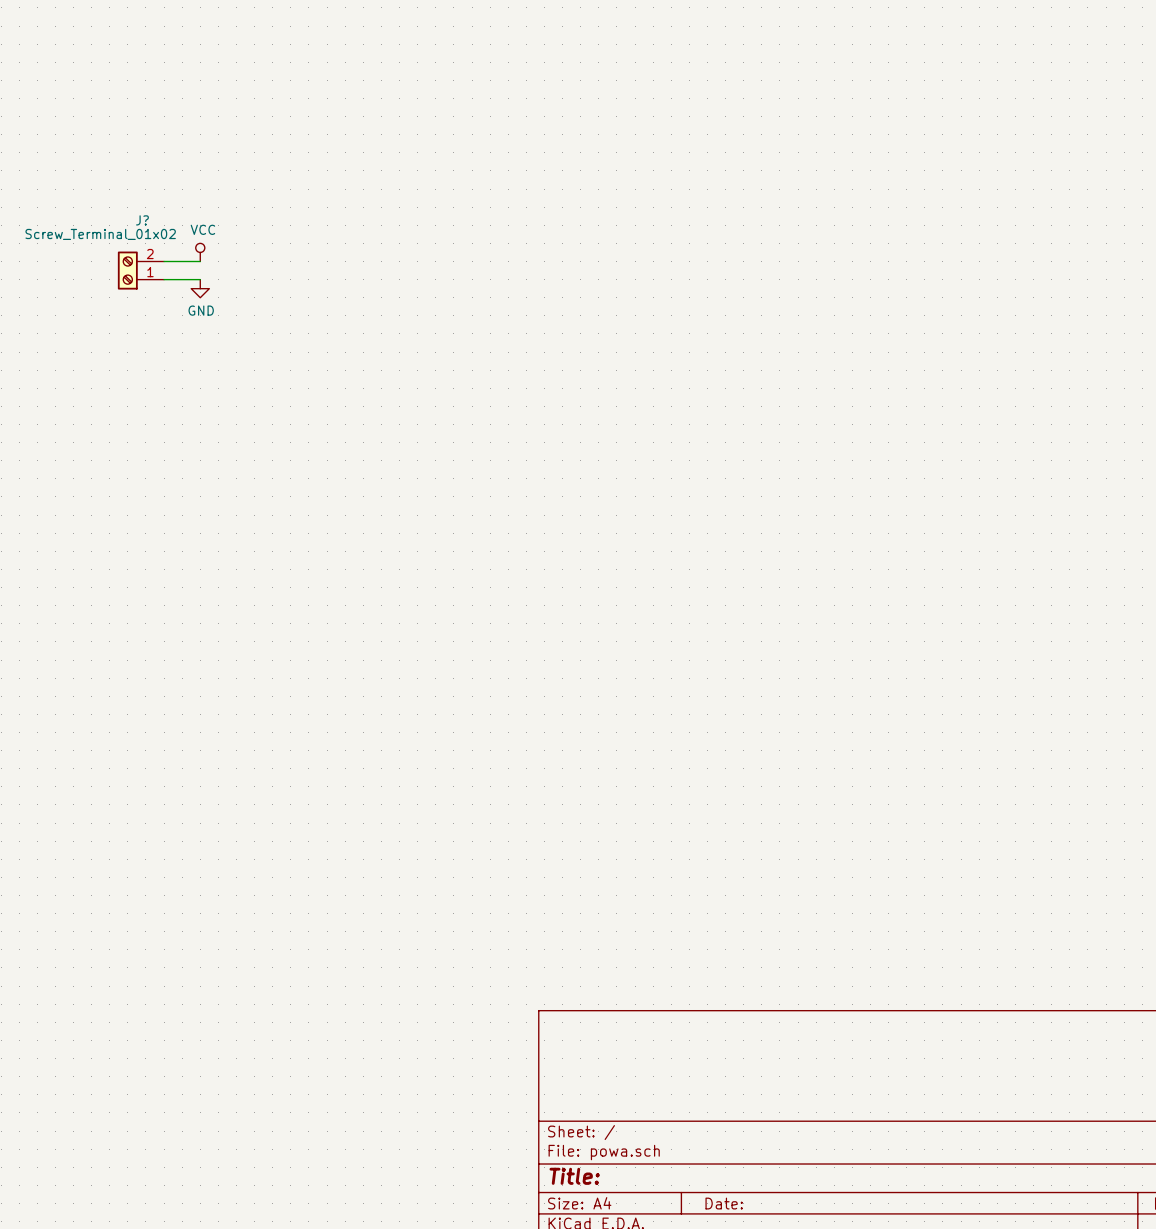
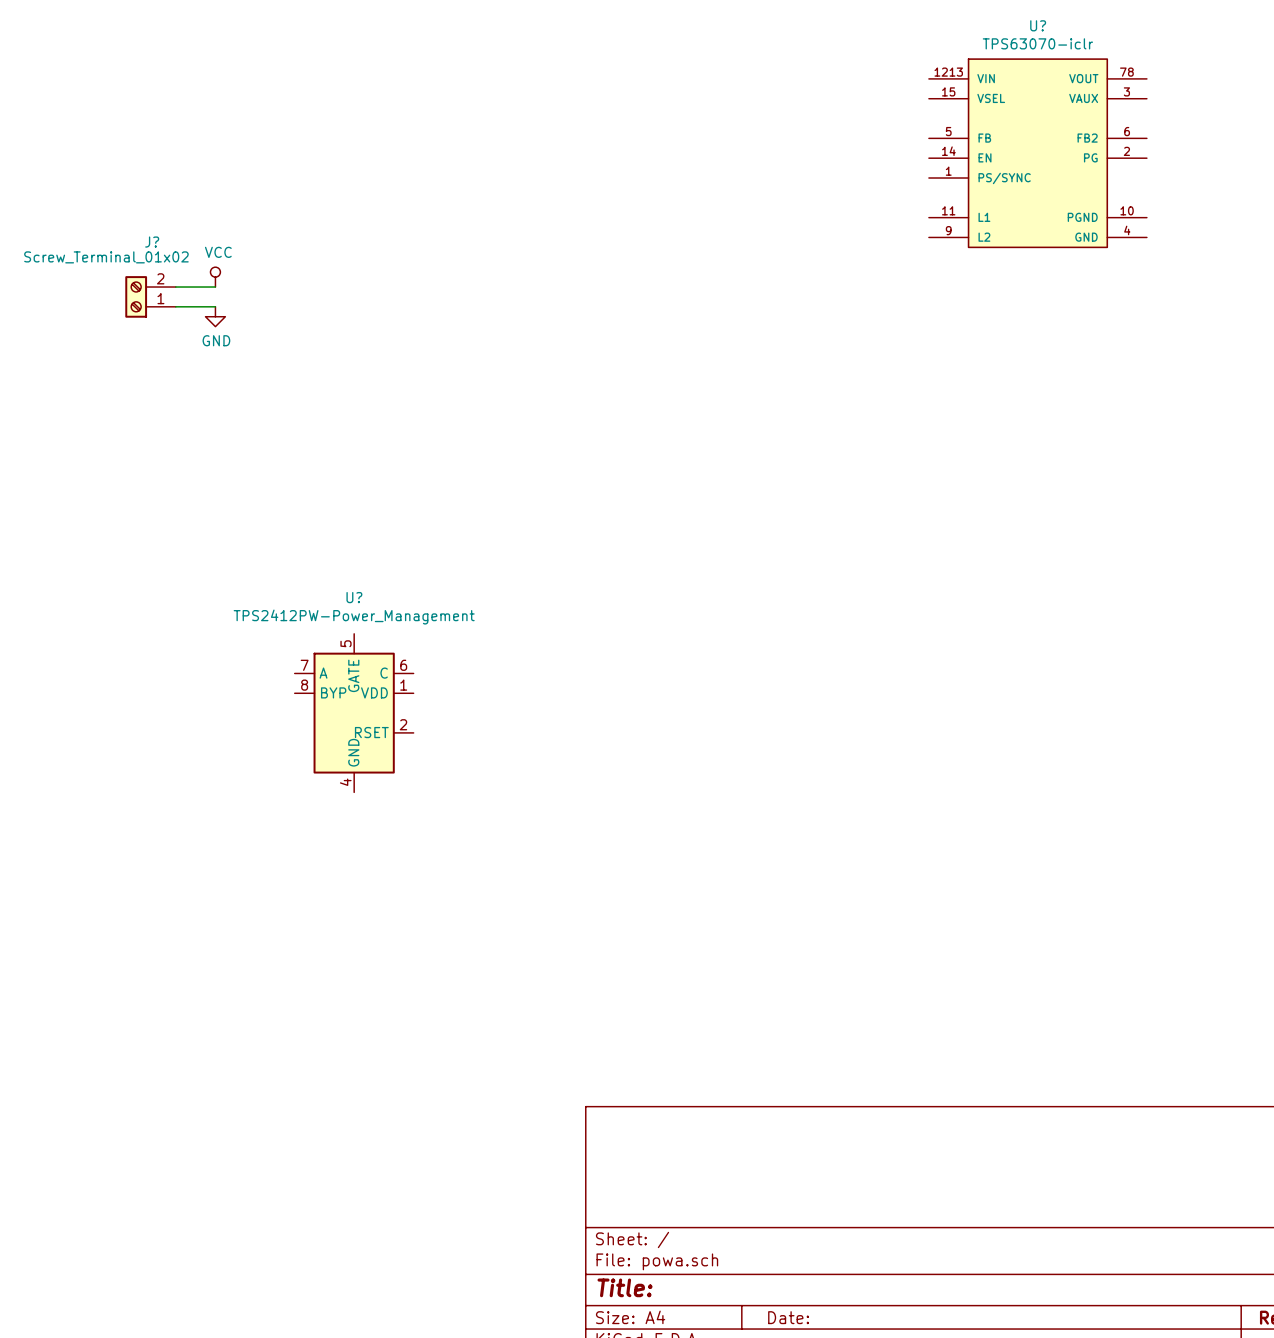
U?: none -> TPS63070-iclr (1037, 153)
U?: none -> TPS2412PW-Power_Management (354, 713)

